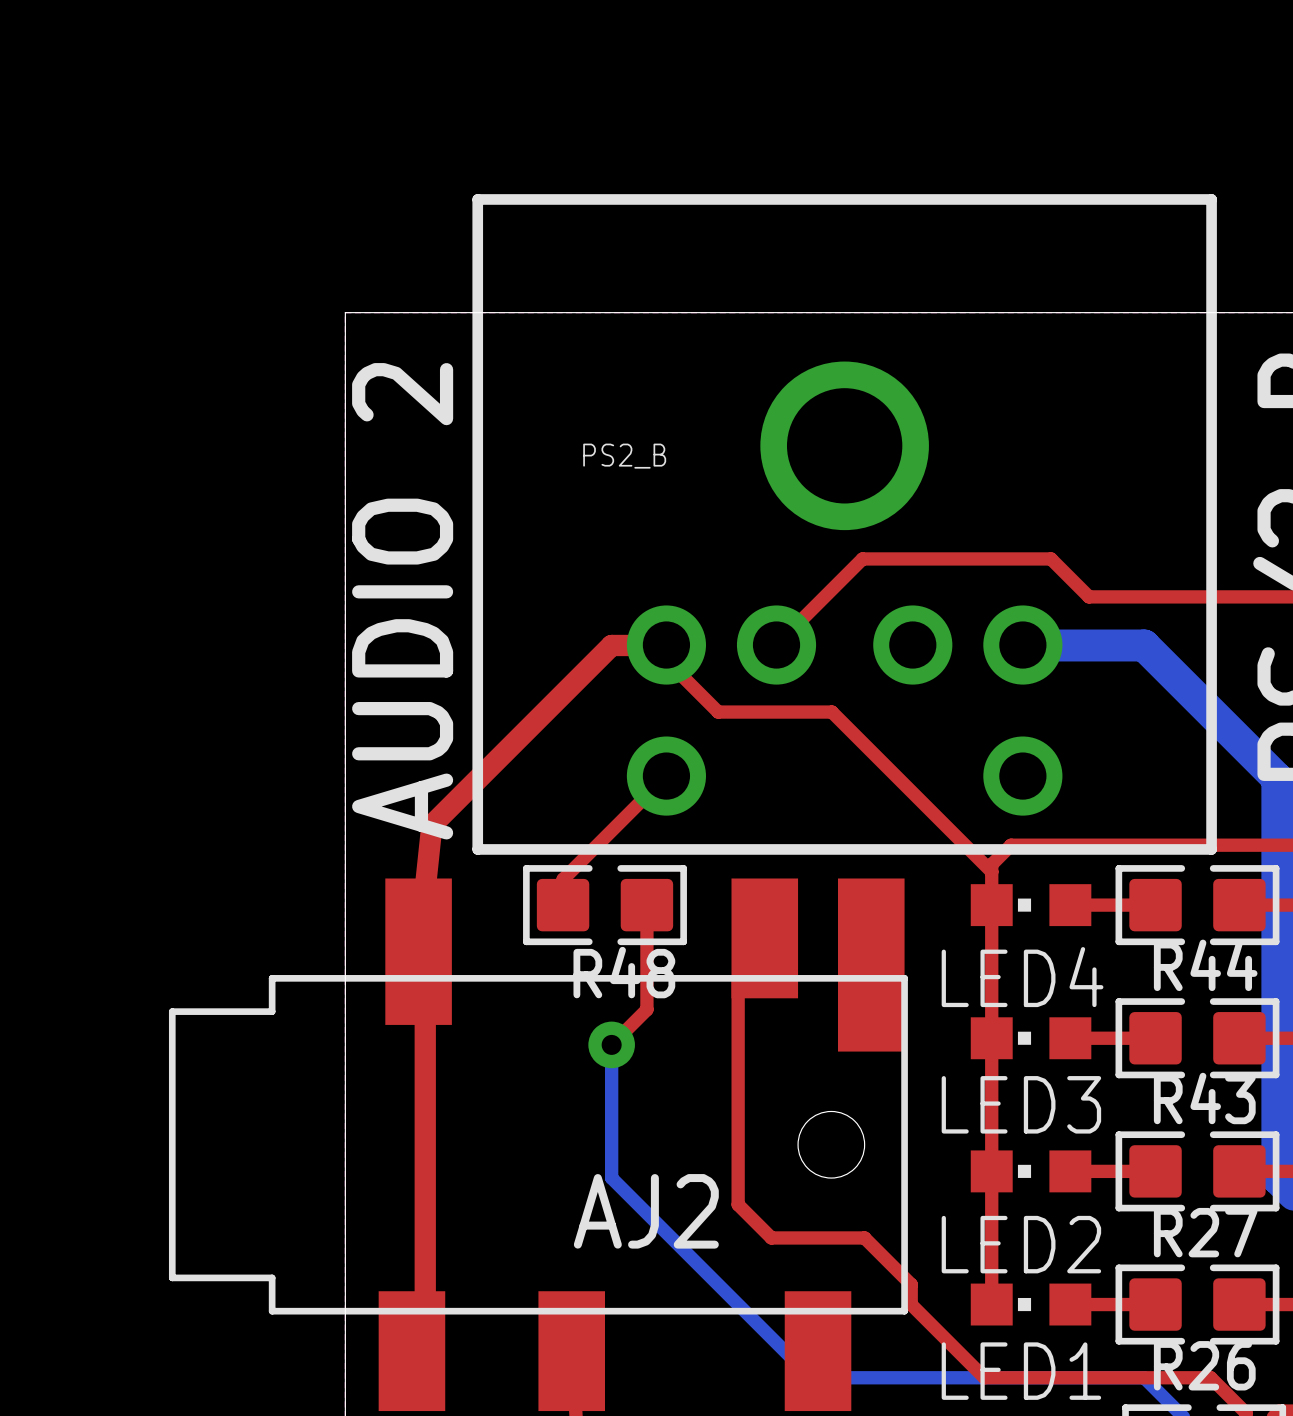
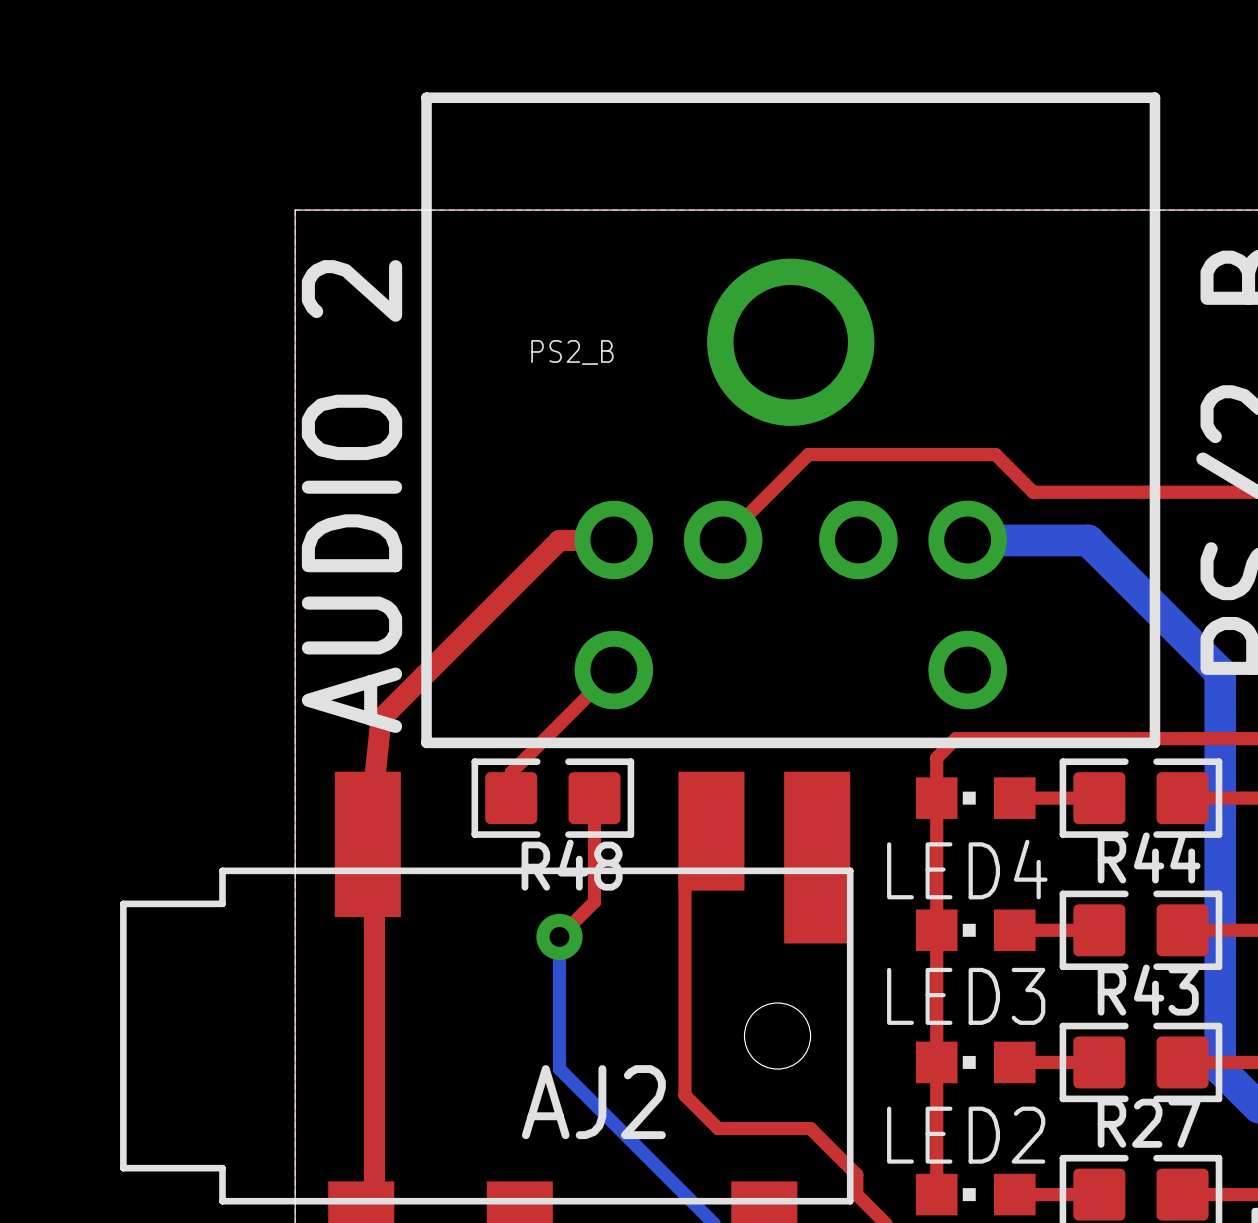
top track: (665, 645) (665, 659) (718, 712) (831, 712) (991, 871) -> none

